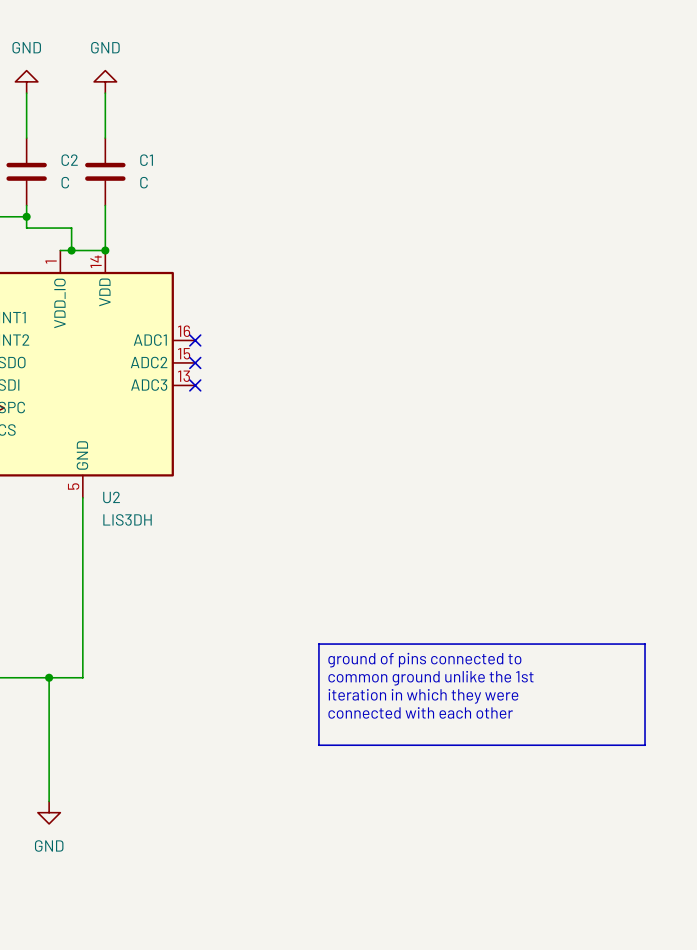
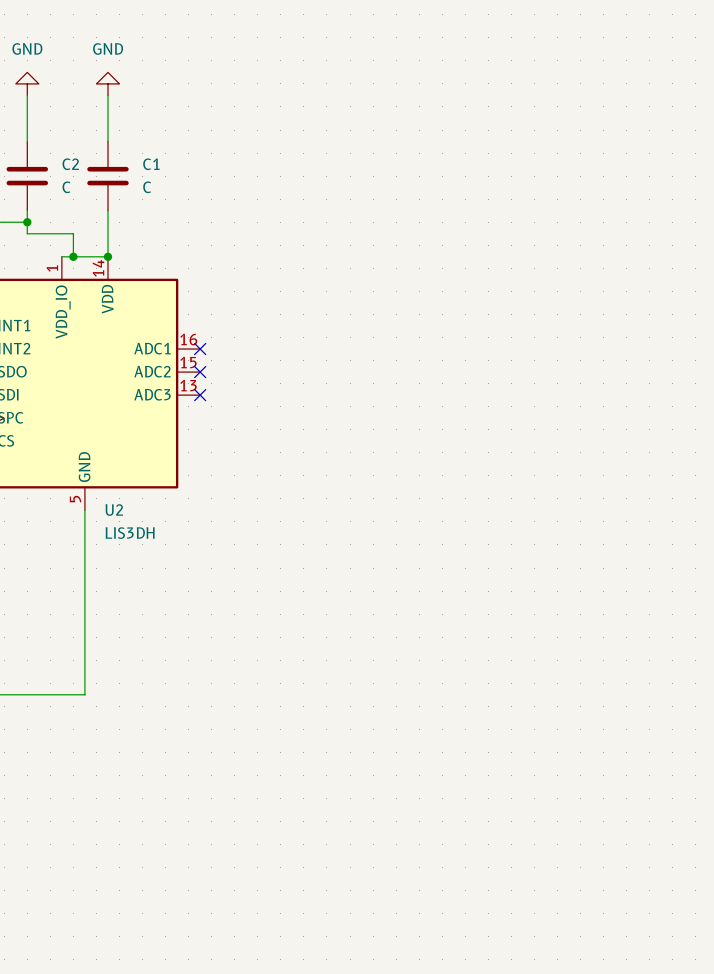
line: (318, 644) (645, 644) (645, 745) (318, 745) (318, 644) -> none
text: ground of pins connected to (424, 660) -> none
wire: (49, 677) (49, 801) -> none
junction: (49, 677) -> none
text: common ground unlike the 1st (430, 678) -> none
text: iteration in which they were (423, 696) -> none
text: connected with each other (420, 712) -> none
power symbol: GND (49, 812) -> none

